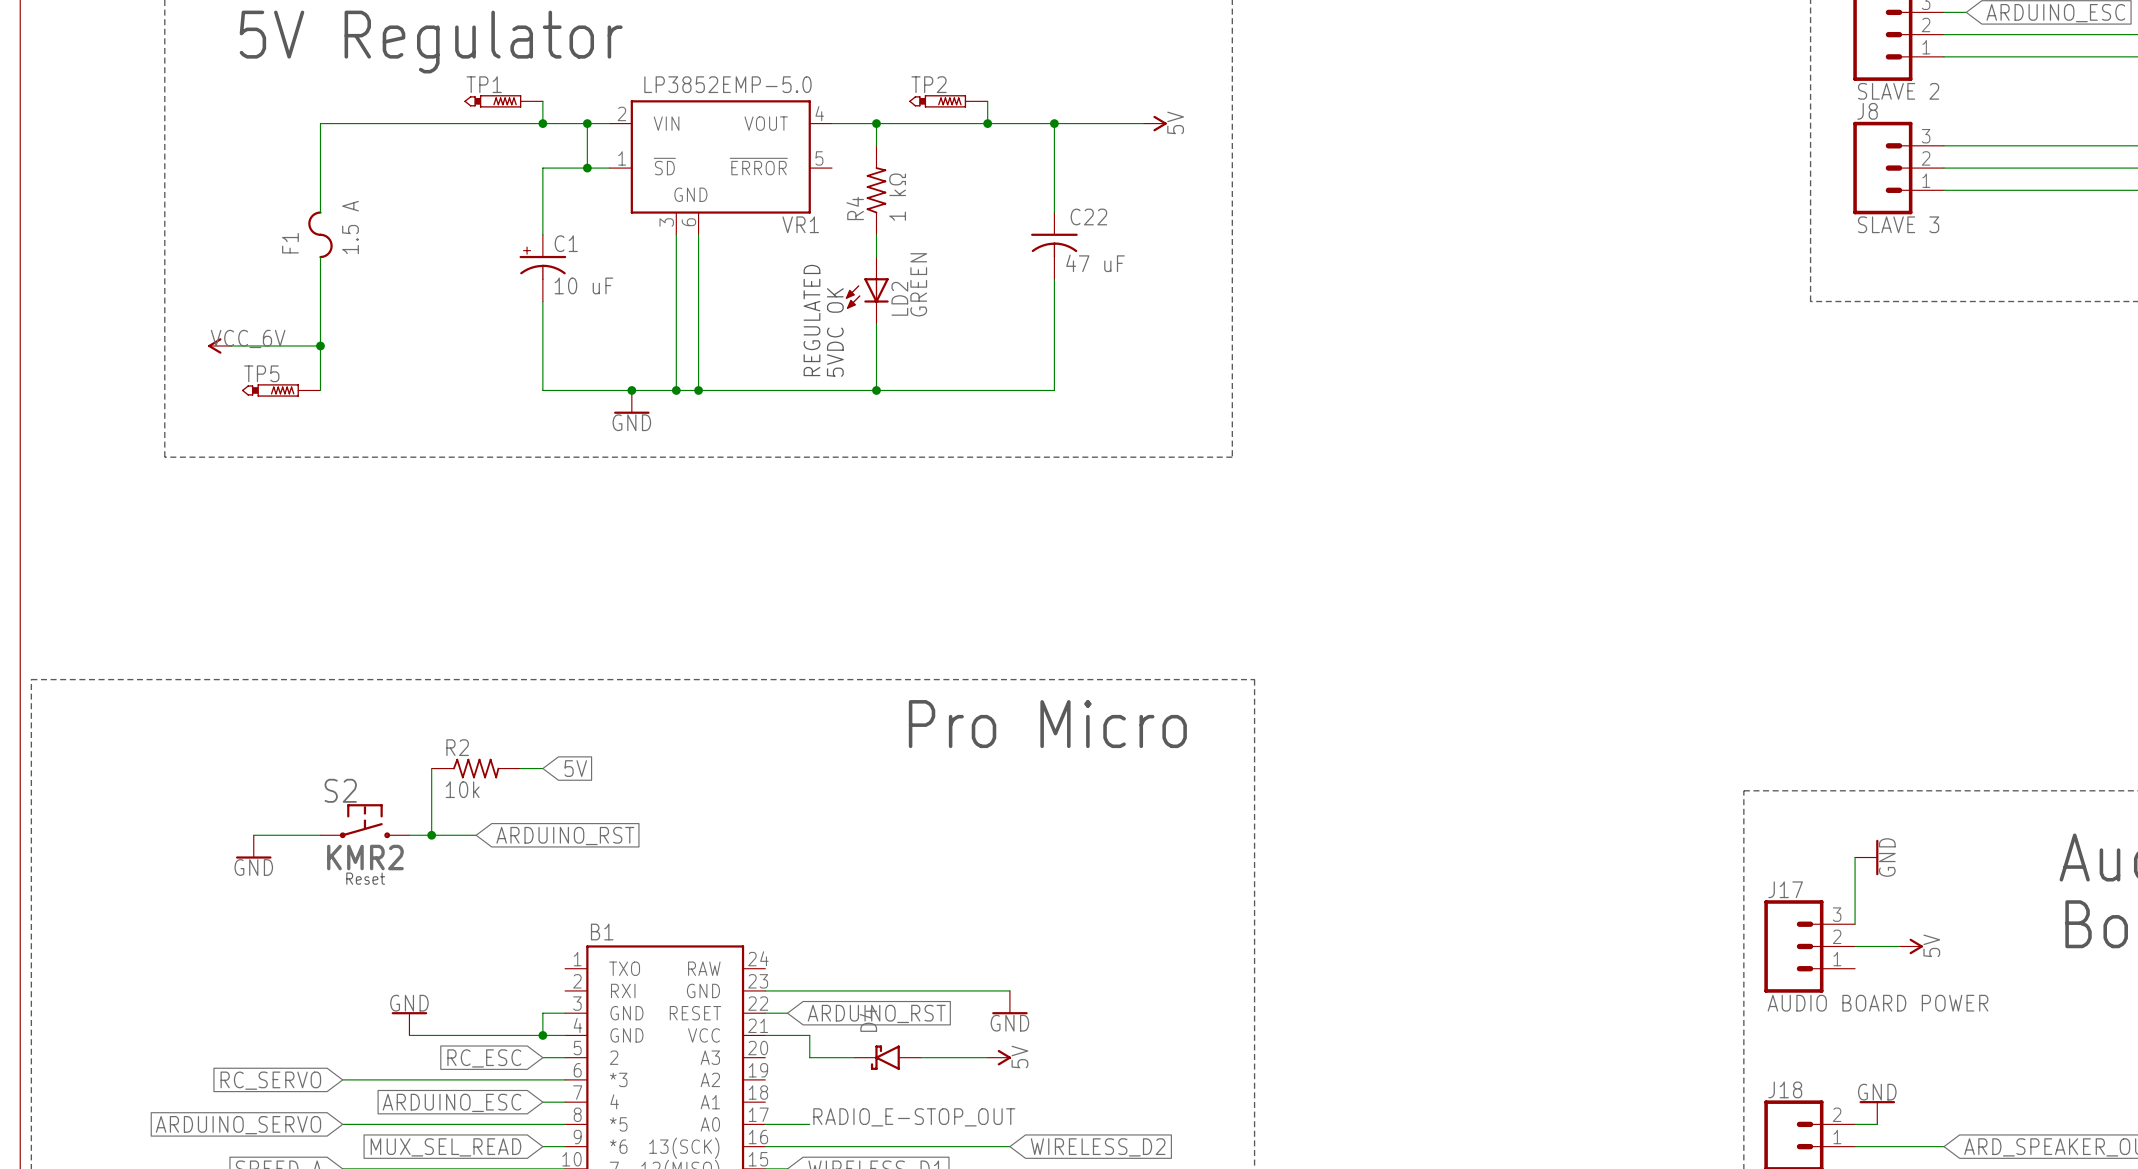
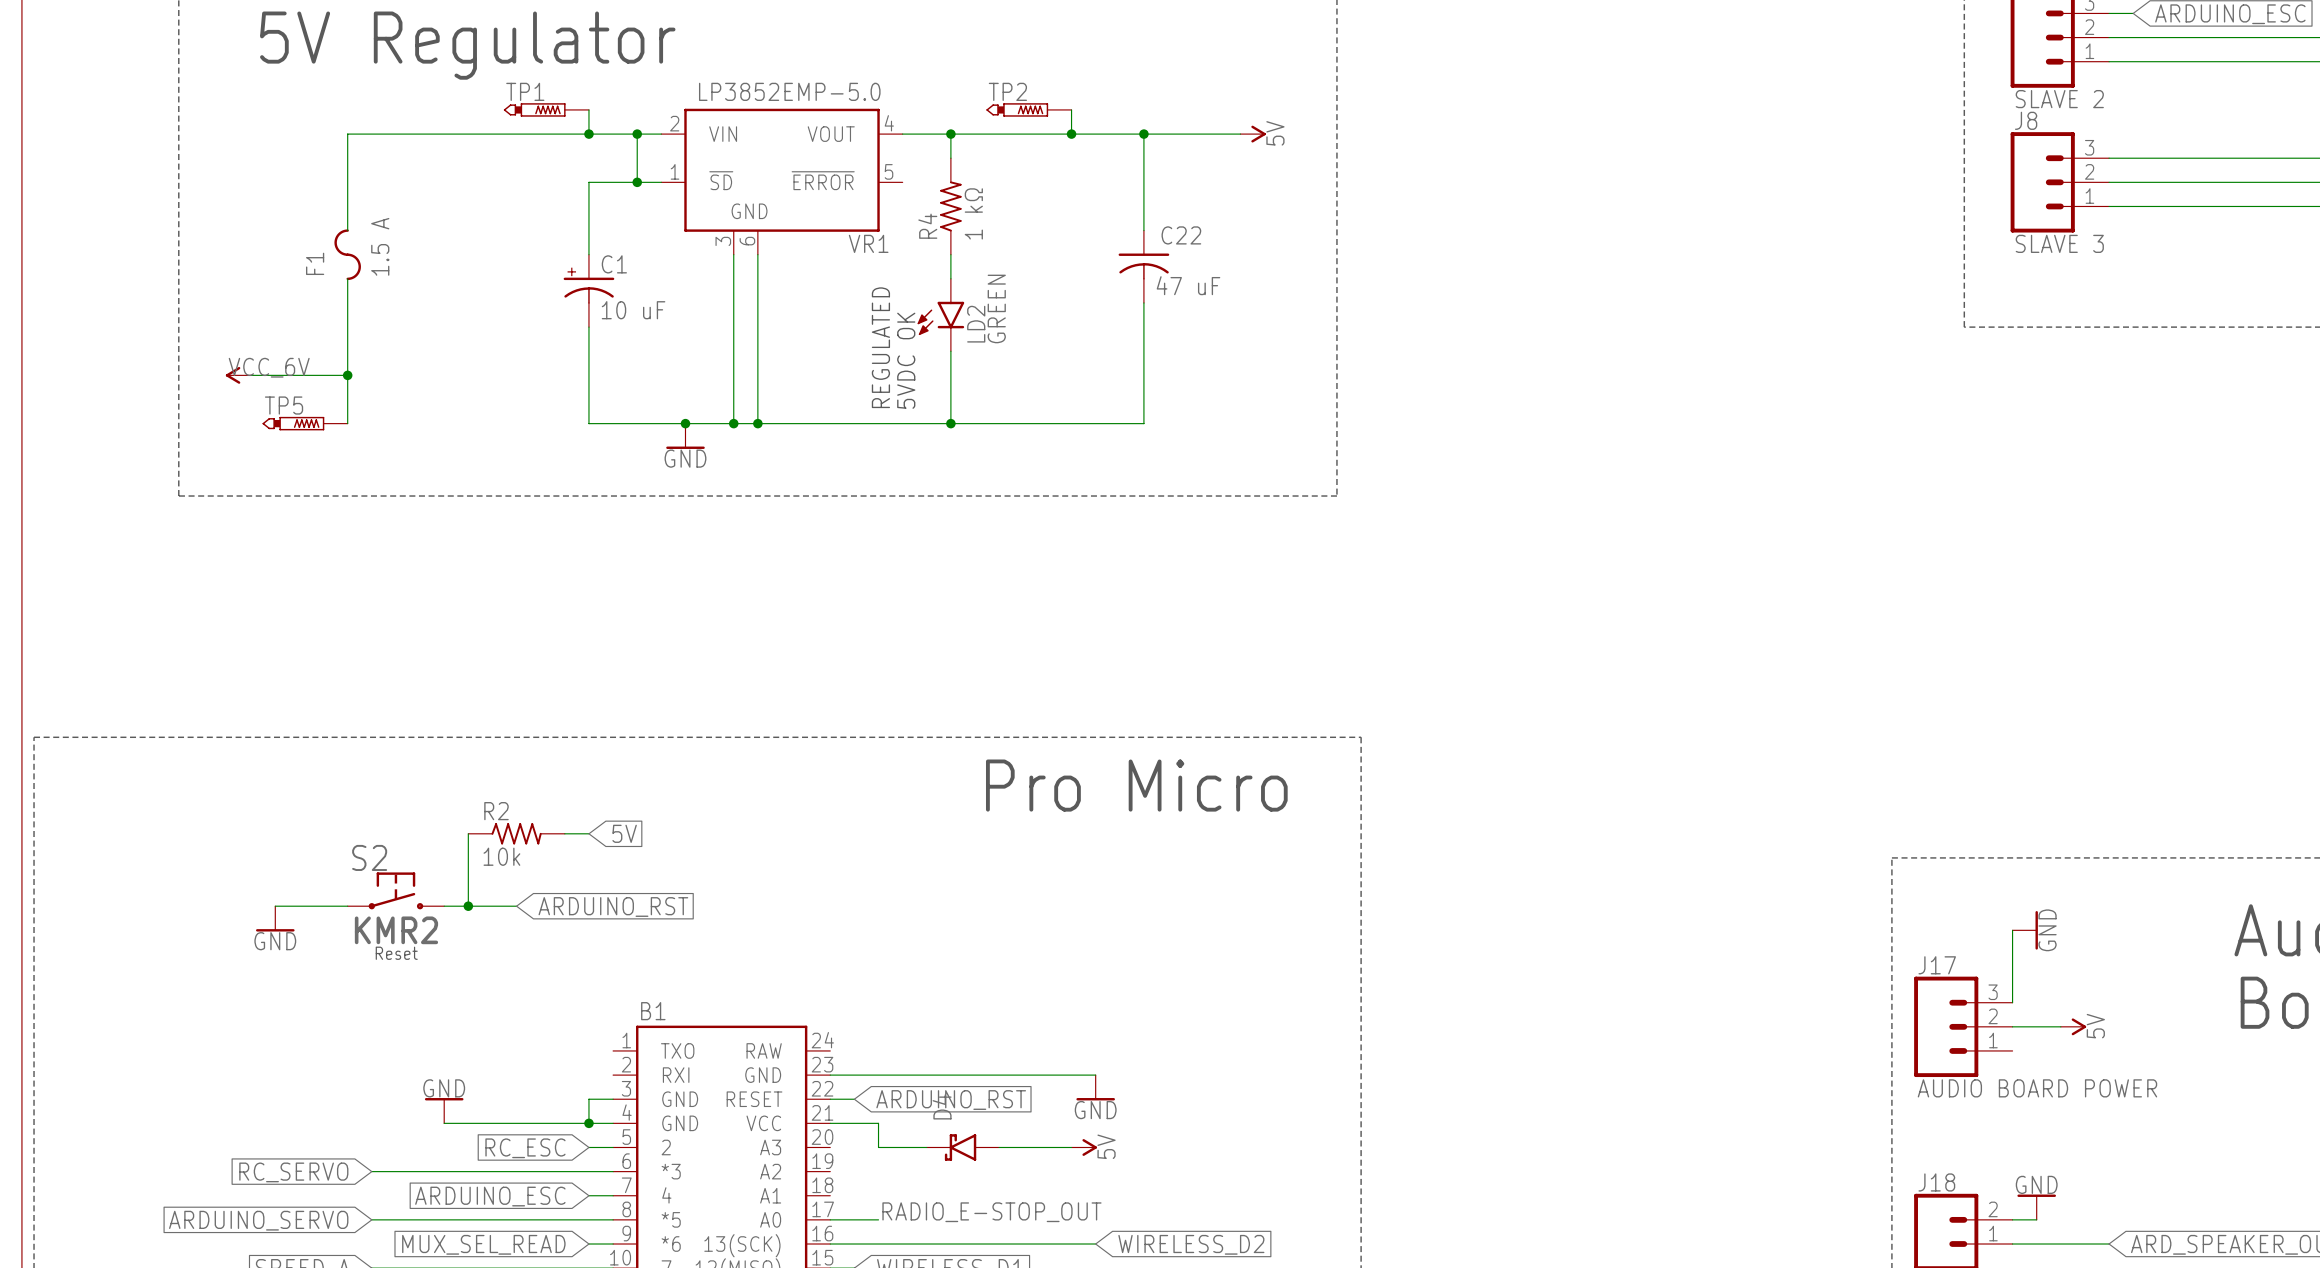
LD2 symbol: [845, 257, 889, 324] -> [917, 278, 965, 352]

